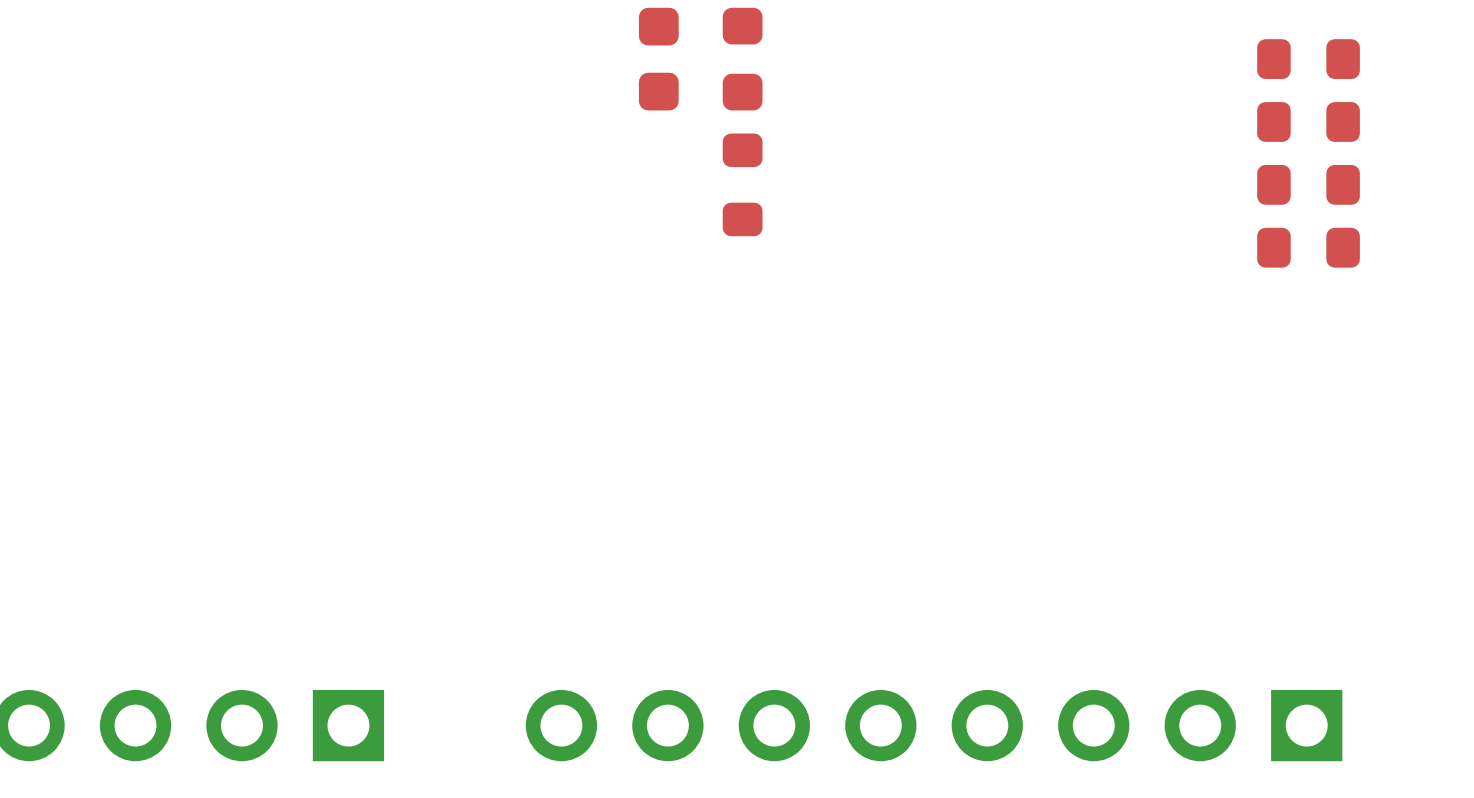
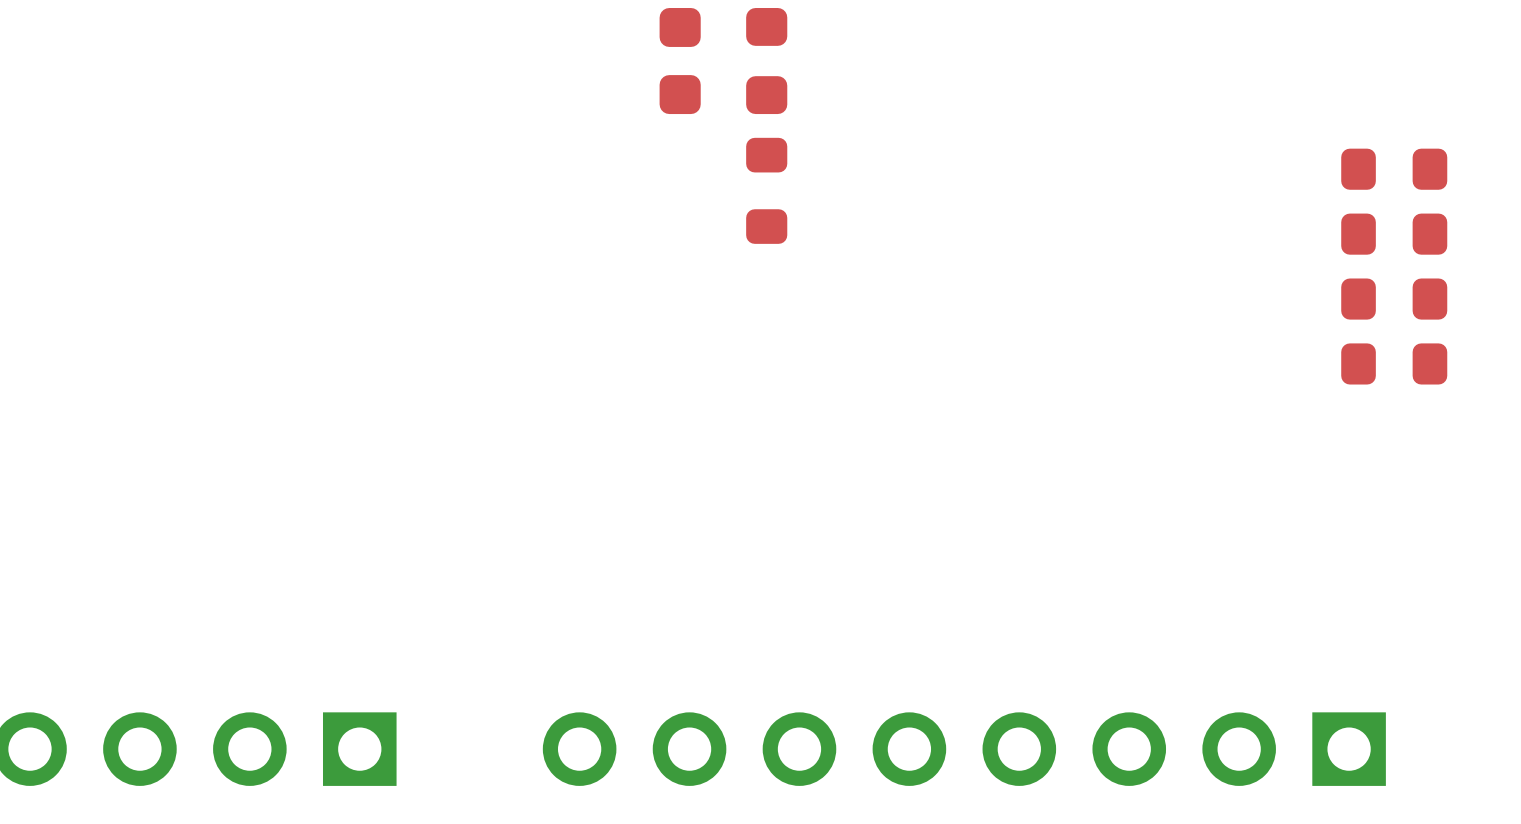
part: (1308, 59) -> none
part: (1308, 121) -> none
part: none -> (1394, 169)
part: (1308, 184) -> none
part: none -> (1394, 234)
part: (1308, 247) -> none
part: none -> (1394, 299)
part: none -> (1394, 363)

